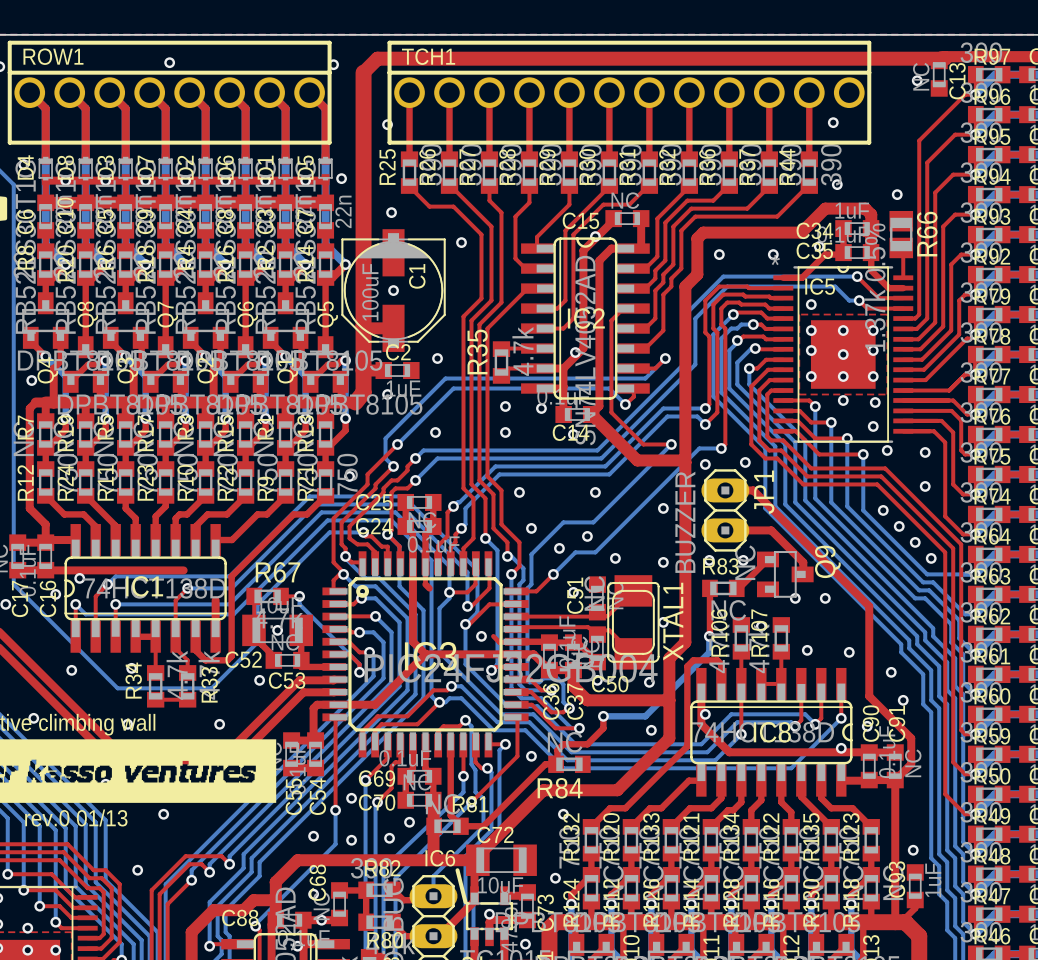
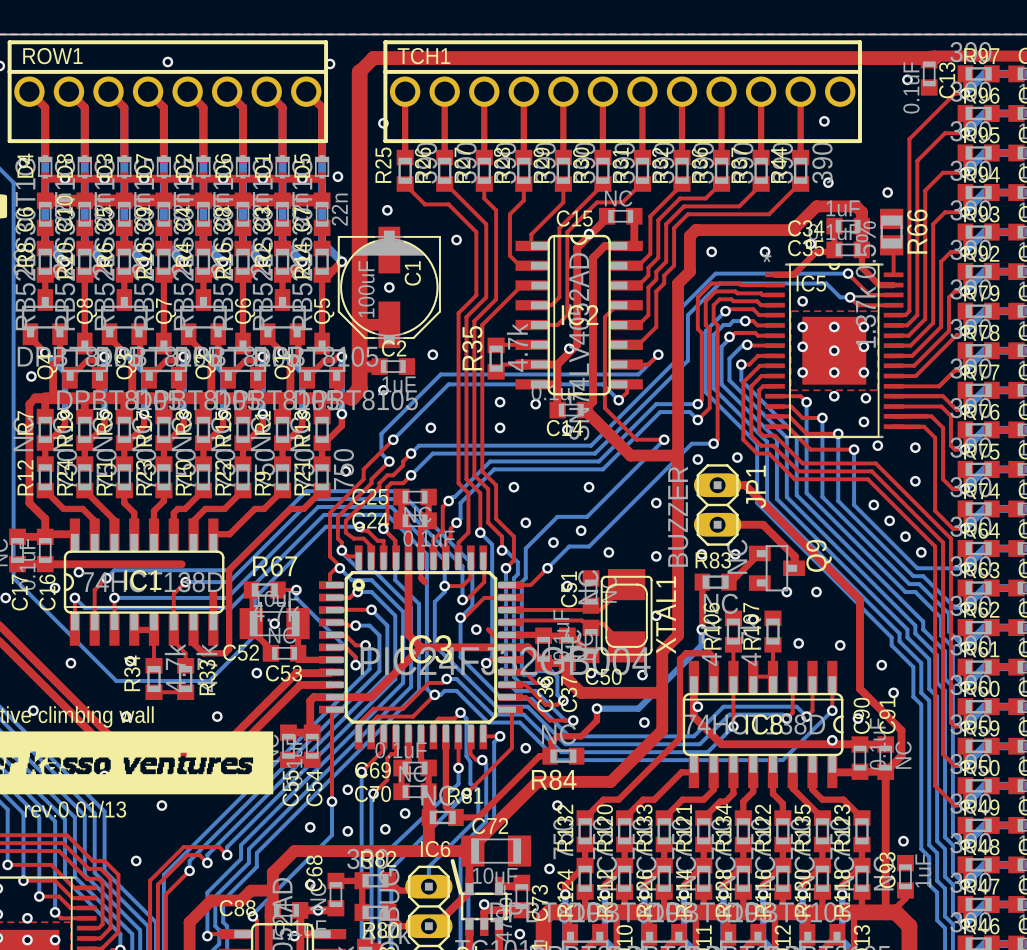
C13 value: NC (921, 76) -> 0.1uF (911, 87)

